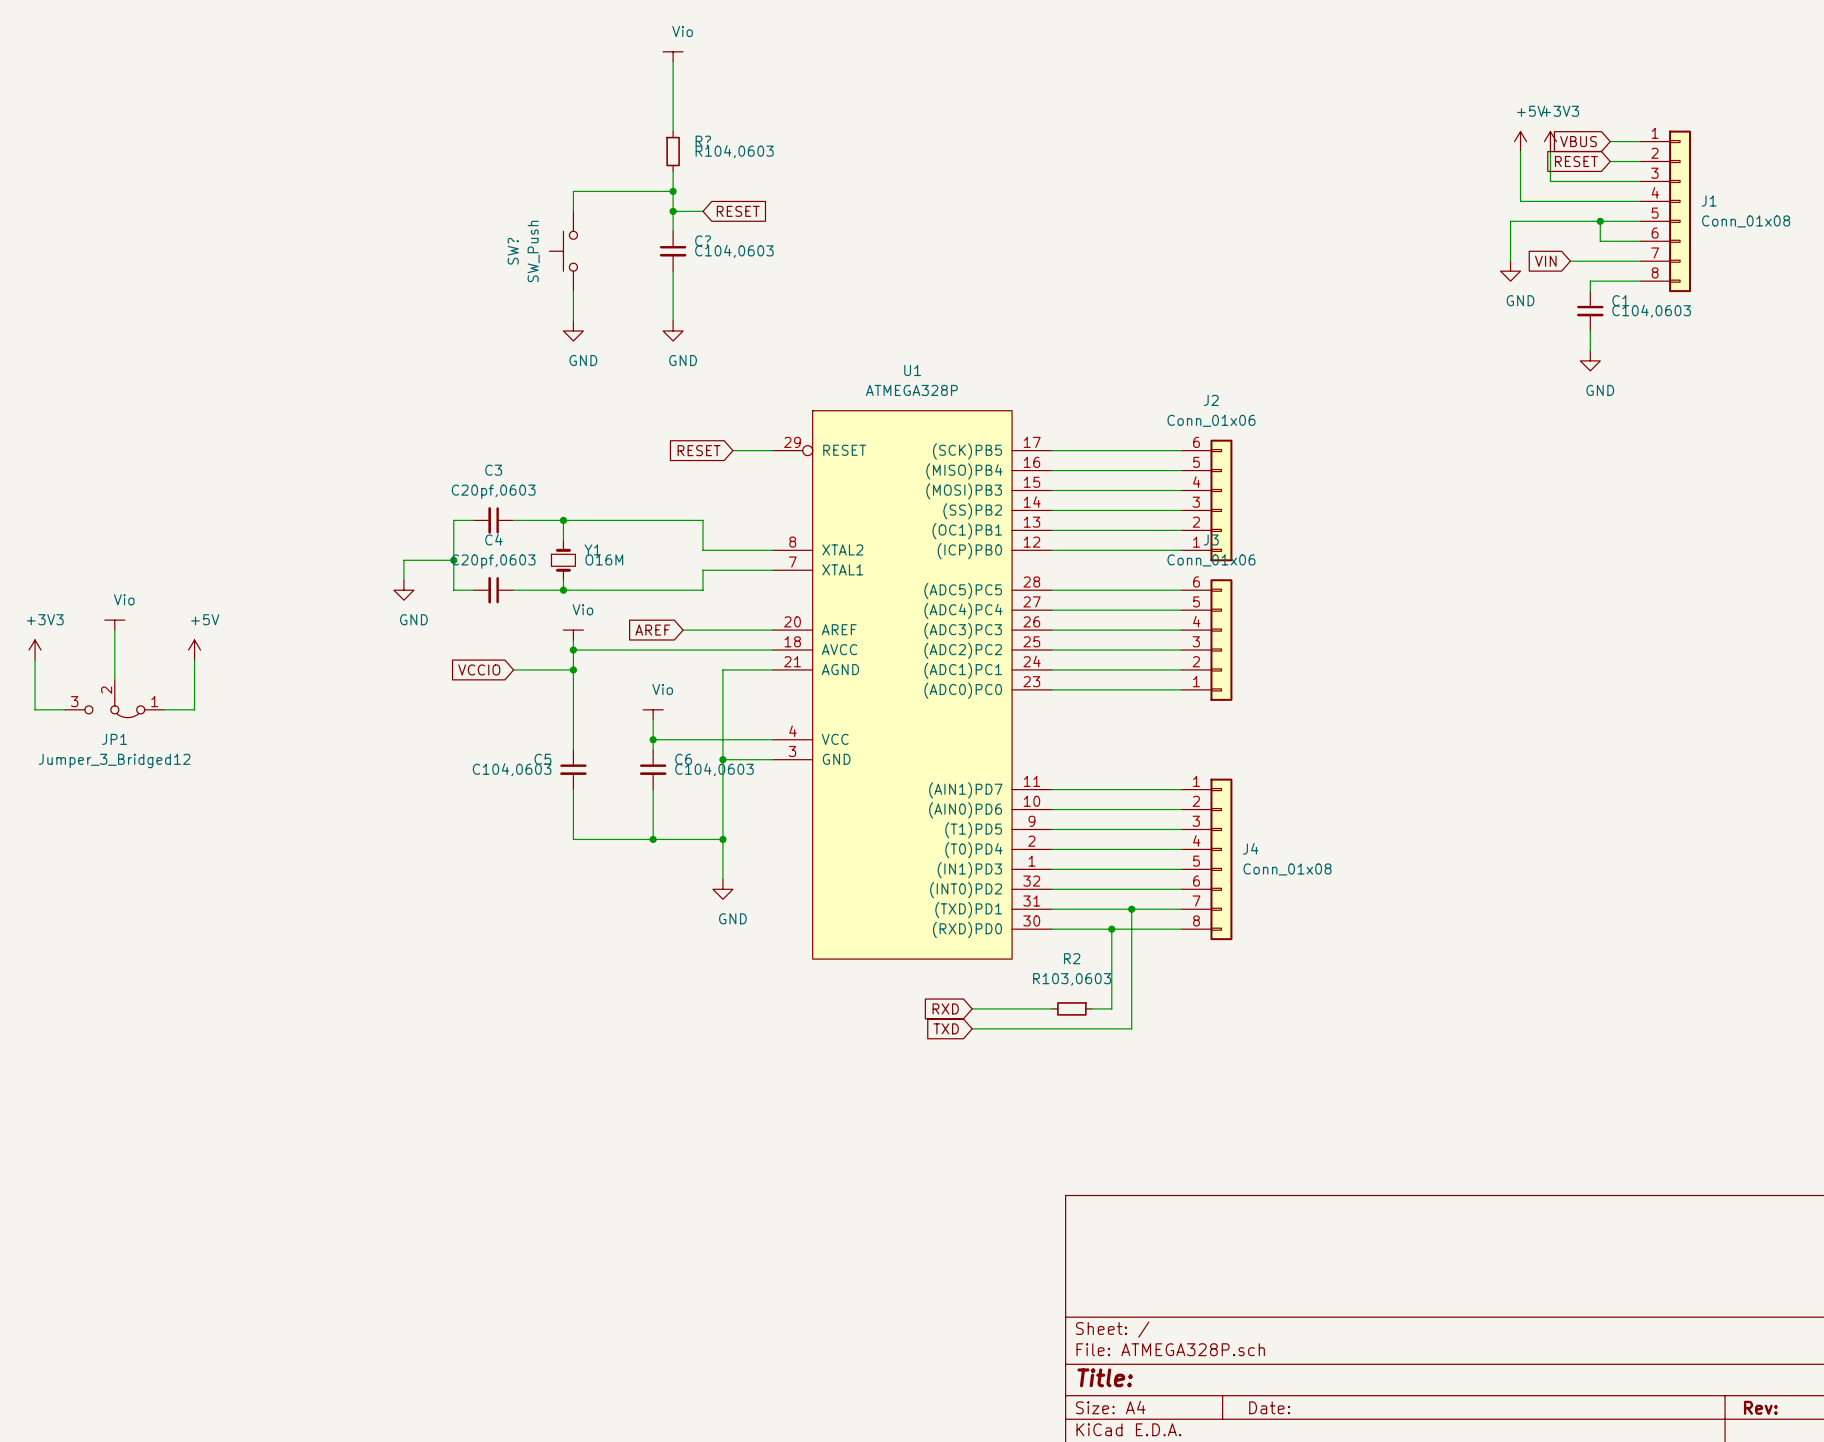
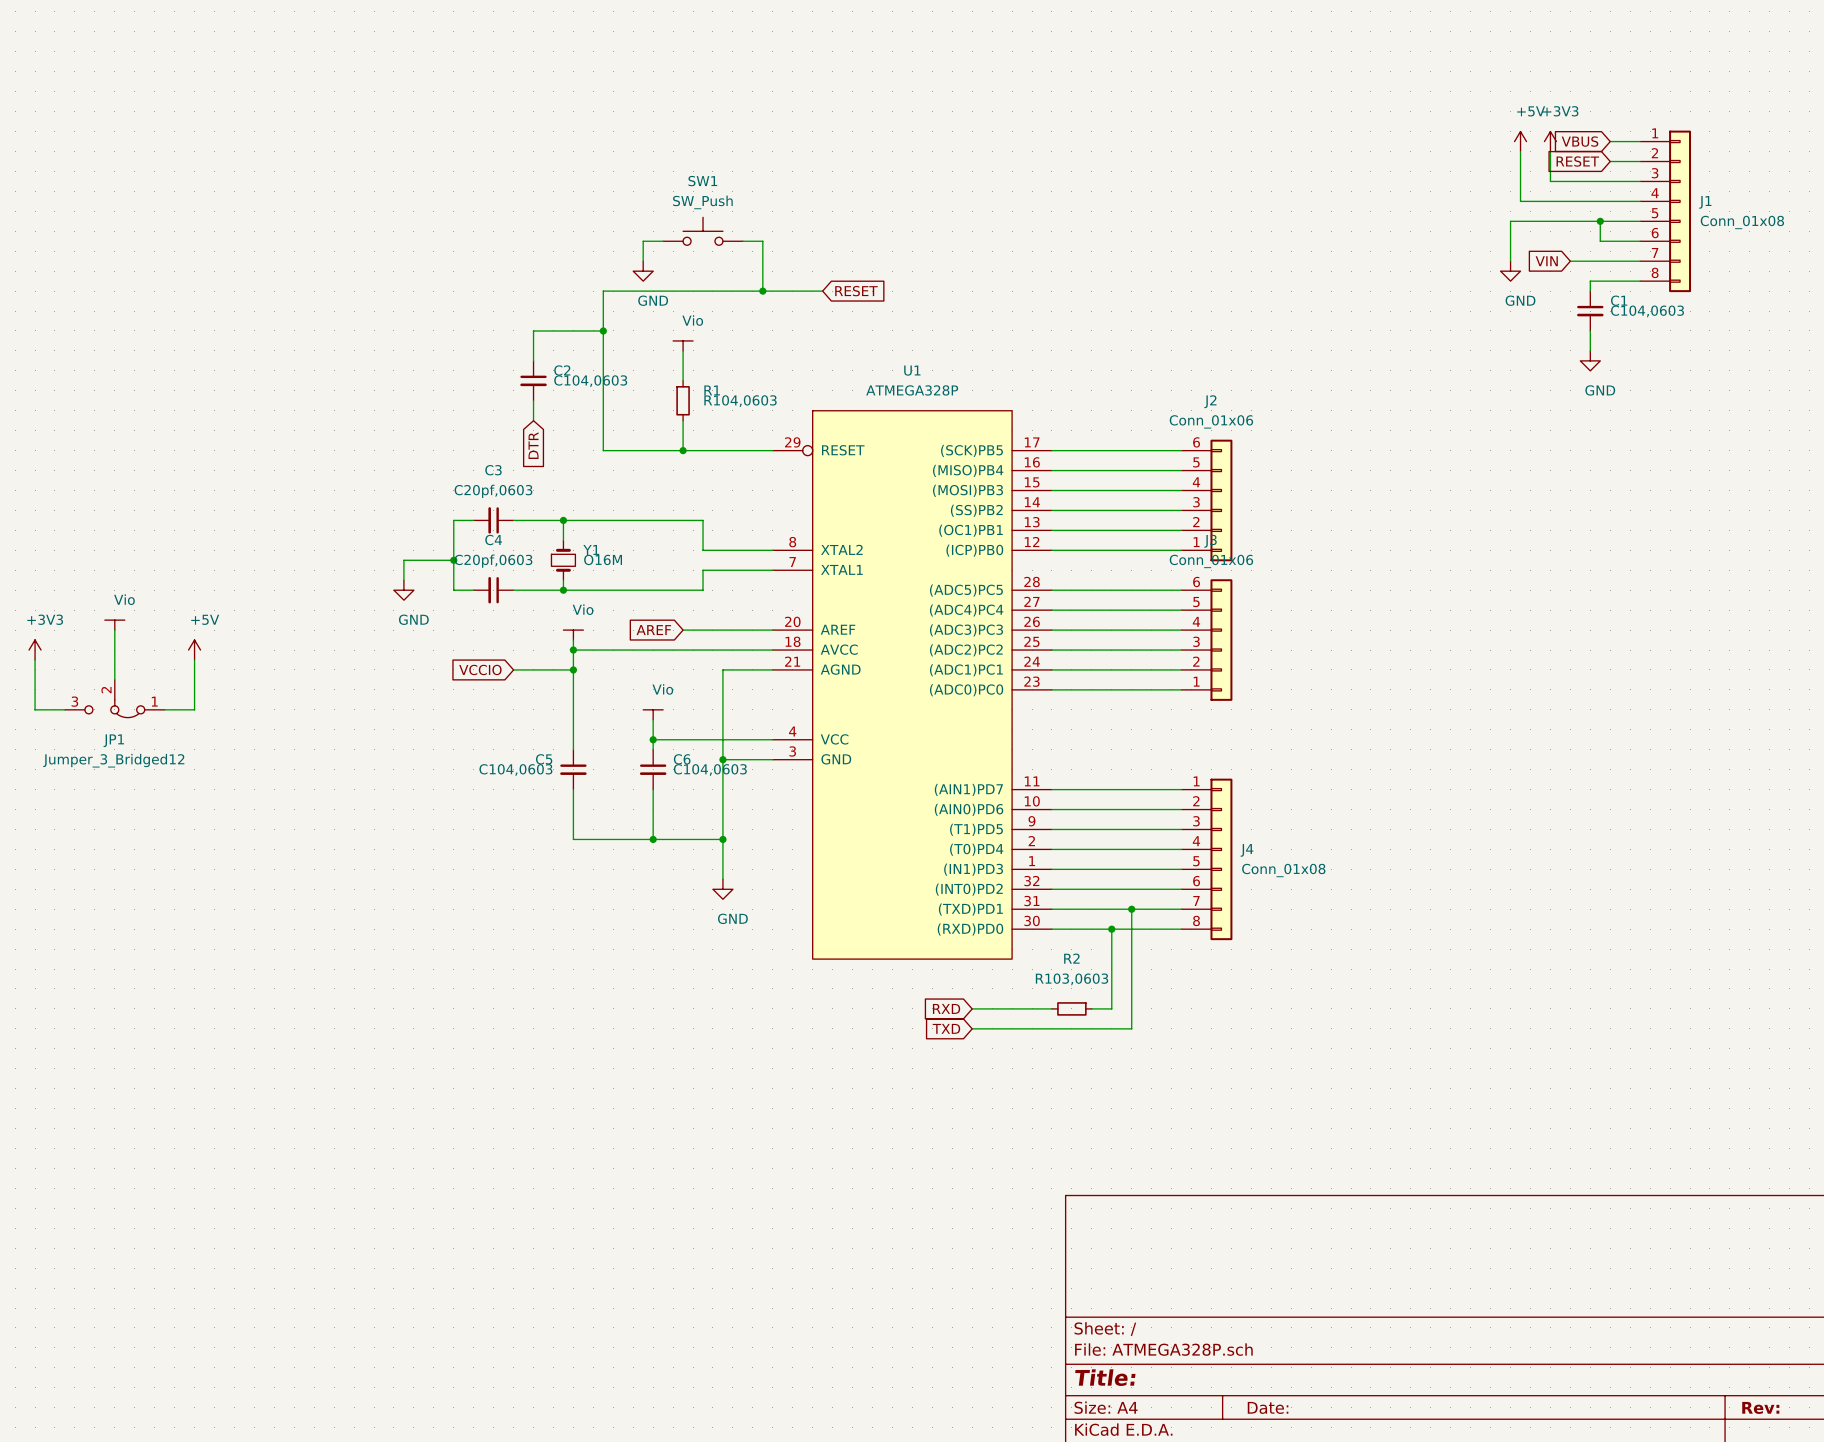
power symbol: Vio (673, 56) -> none
wire: (673, 61) (673, 131) -> none
R?: R104,0603 (673, 151) -> none
wire: (673, 171) (673, 231) -> none
wire: (673, 191) (573, 191) (573, 211) -> none
junction: (673, 191) -> none
wire: (673, 211) (703, 211) -> none
junction: (673, 211) -> none
global label: RESET (738, 211) -> none
SW1: none -> SW_Push (703, 231)
wire: none -> (663, 241) (643, 241) (643, 261)
wire: none -> (742, 241) (762, 241) (762, 291)
SW?: SW_Push (563, 251) -> none
C?: C104,0603 (673, 251) -> none
power symbol: none -> GND (643, 271)
wire: (673, 271) (673, 321) -> none
wire: (573, 291) (573, 321) -> (683, 350) (683, 380)
junction: none -> (762, 291)
wire: none -> (822, 291) (603, 291) (603, 450) (732, 450)
global label: none -> RESET (856, 291)
power symbol: GND (573, 330) -> none
wire: none -> (603, 330) (533, 330) (533, 360)
junction: none -> (603, 330)
power symbol: GND (673, 330) -> none
power symbol: none -> Vio (683, 345)
C2: none -> C104,0603 (533, 380)
wire: none -> (533, 400) (533, 420)
R1: none -> R104,0603 (683, 400)
wire: none -> (683, 420) (683, 450)
global label: none -> DTR (533, 445)
junction: none -> (683, 450)
global label: RESET (699, 450) -> none

